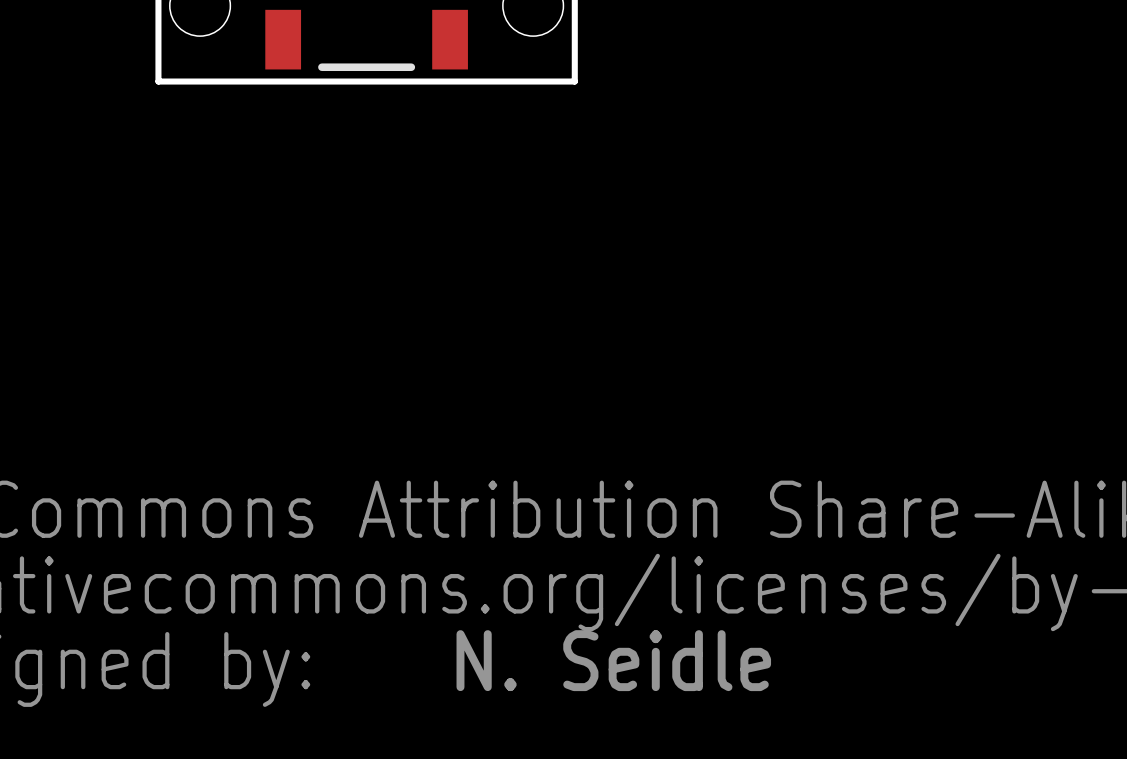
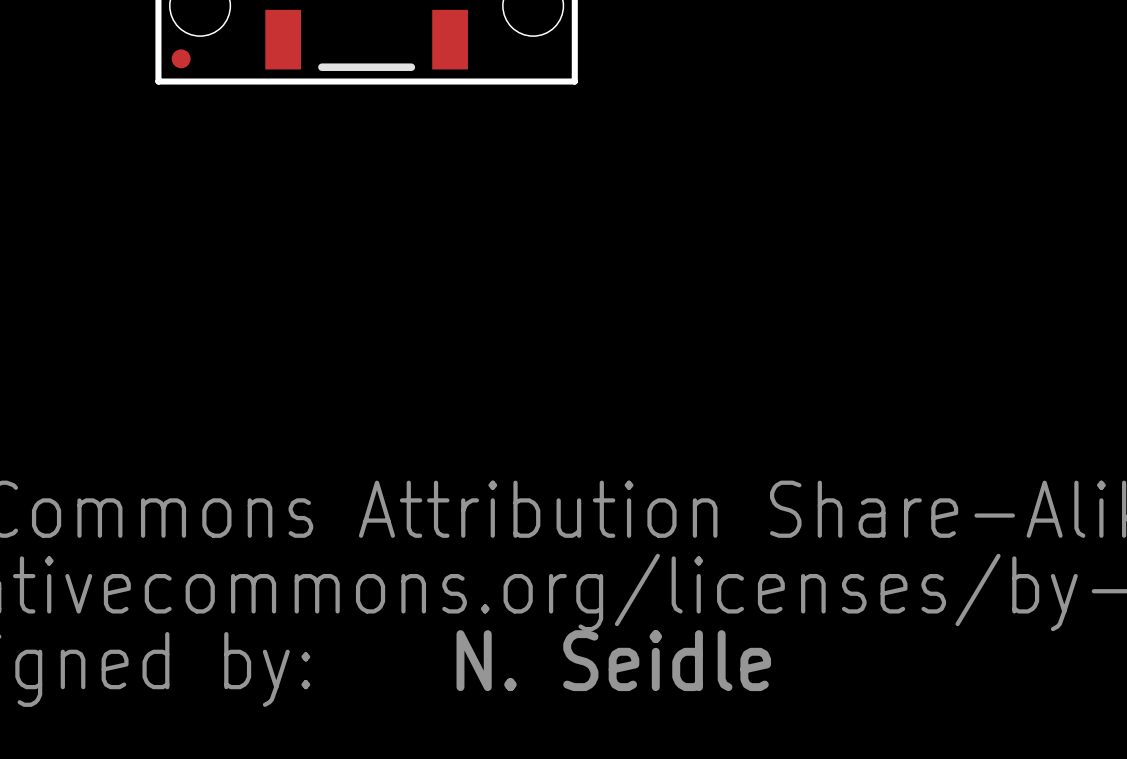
part: none -> (181, 58)

